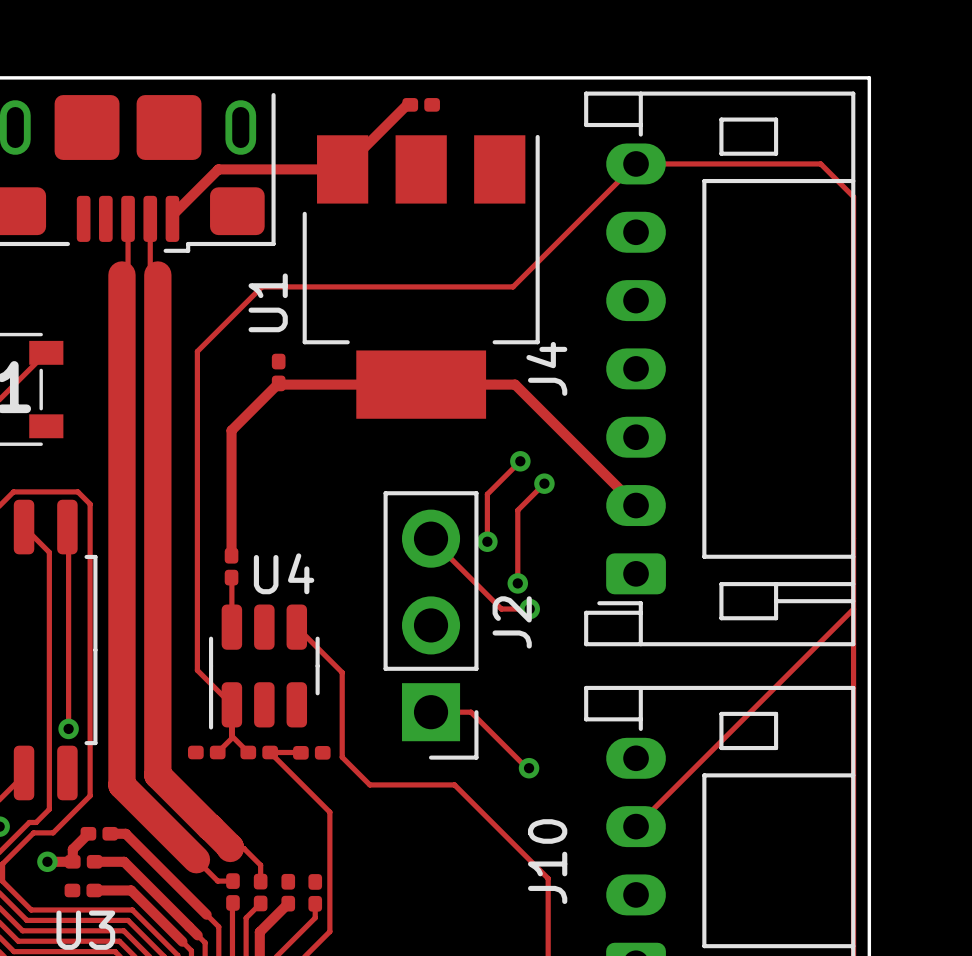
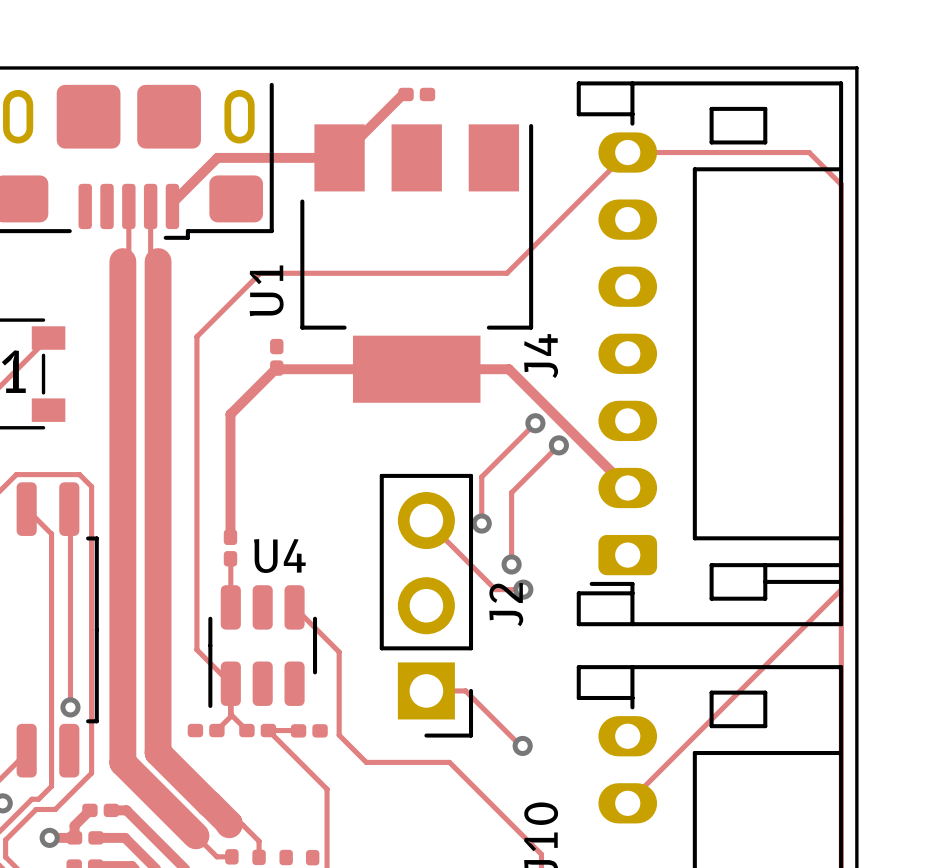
track: none -> (535, 423) (514, 444)
via: none -> (535, 423)
via: (520, 461) -> none
track: none -> (558, 445) (537, 466)
via: none -> (558, 445)
via: (544, 483) -> none

